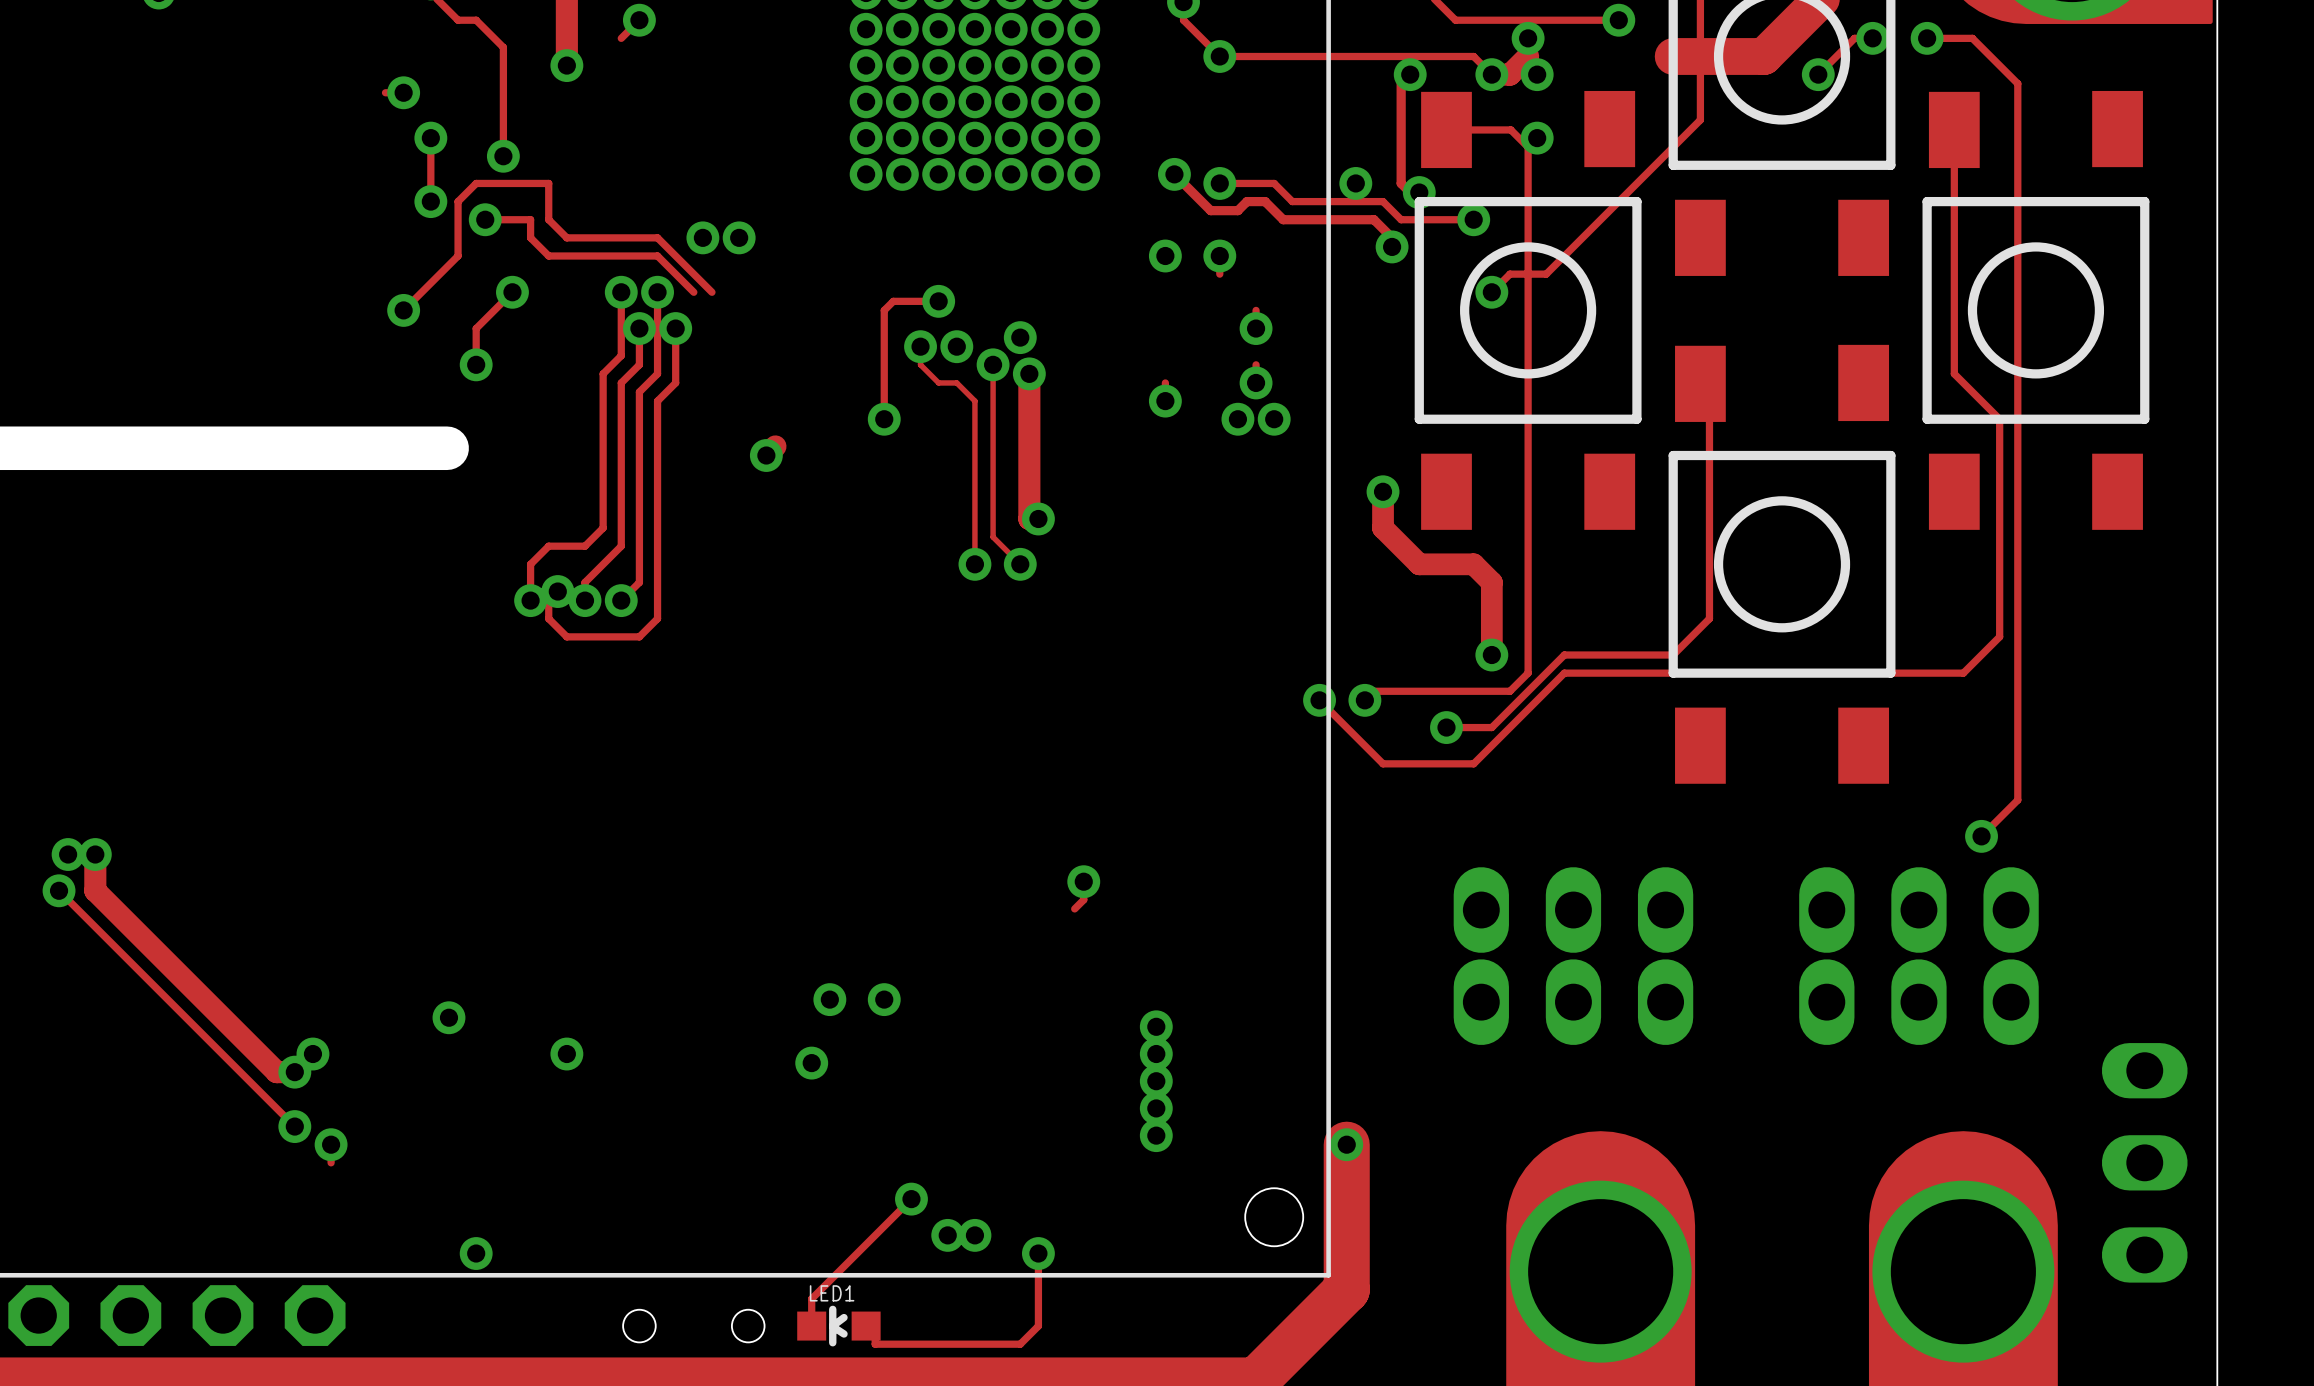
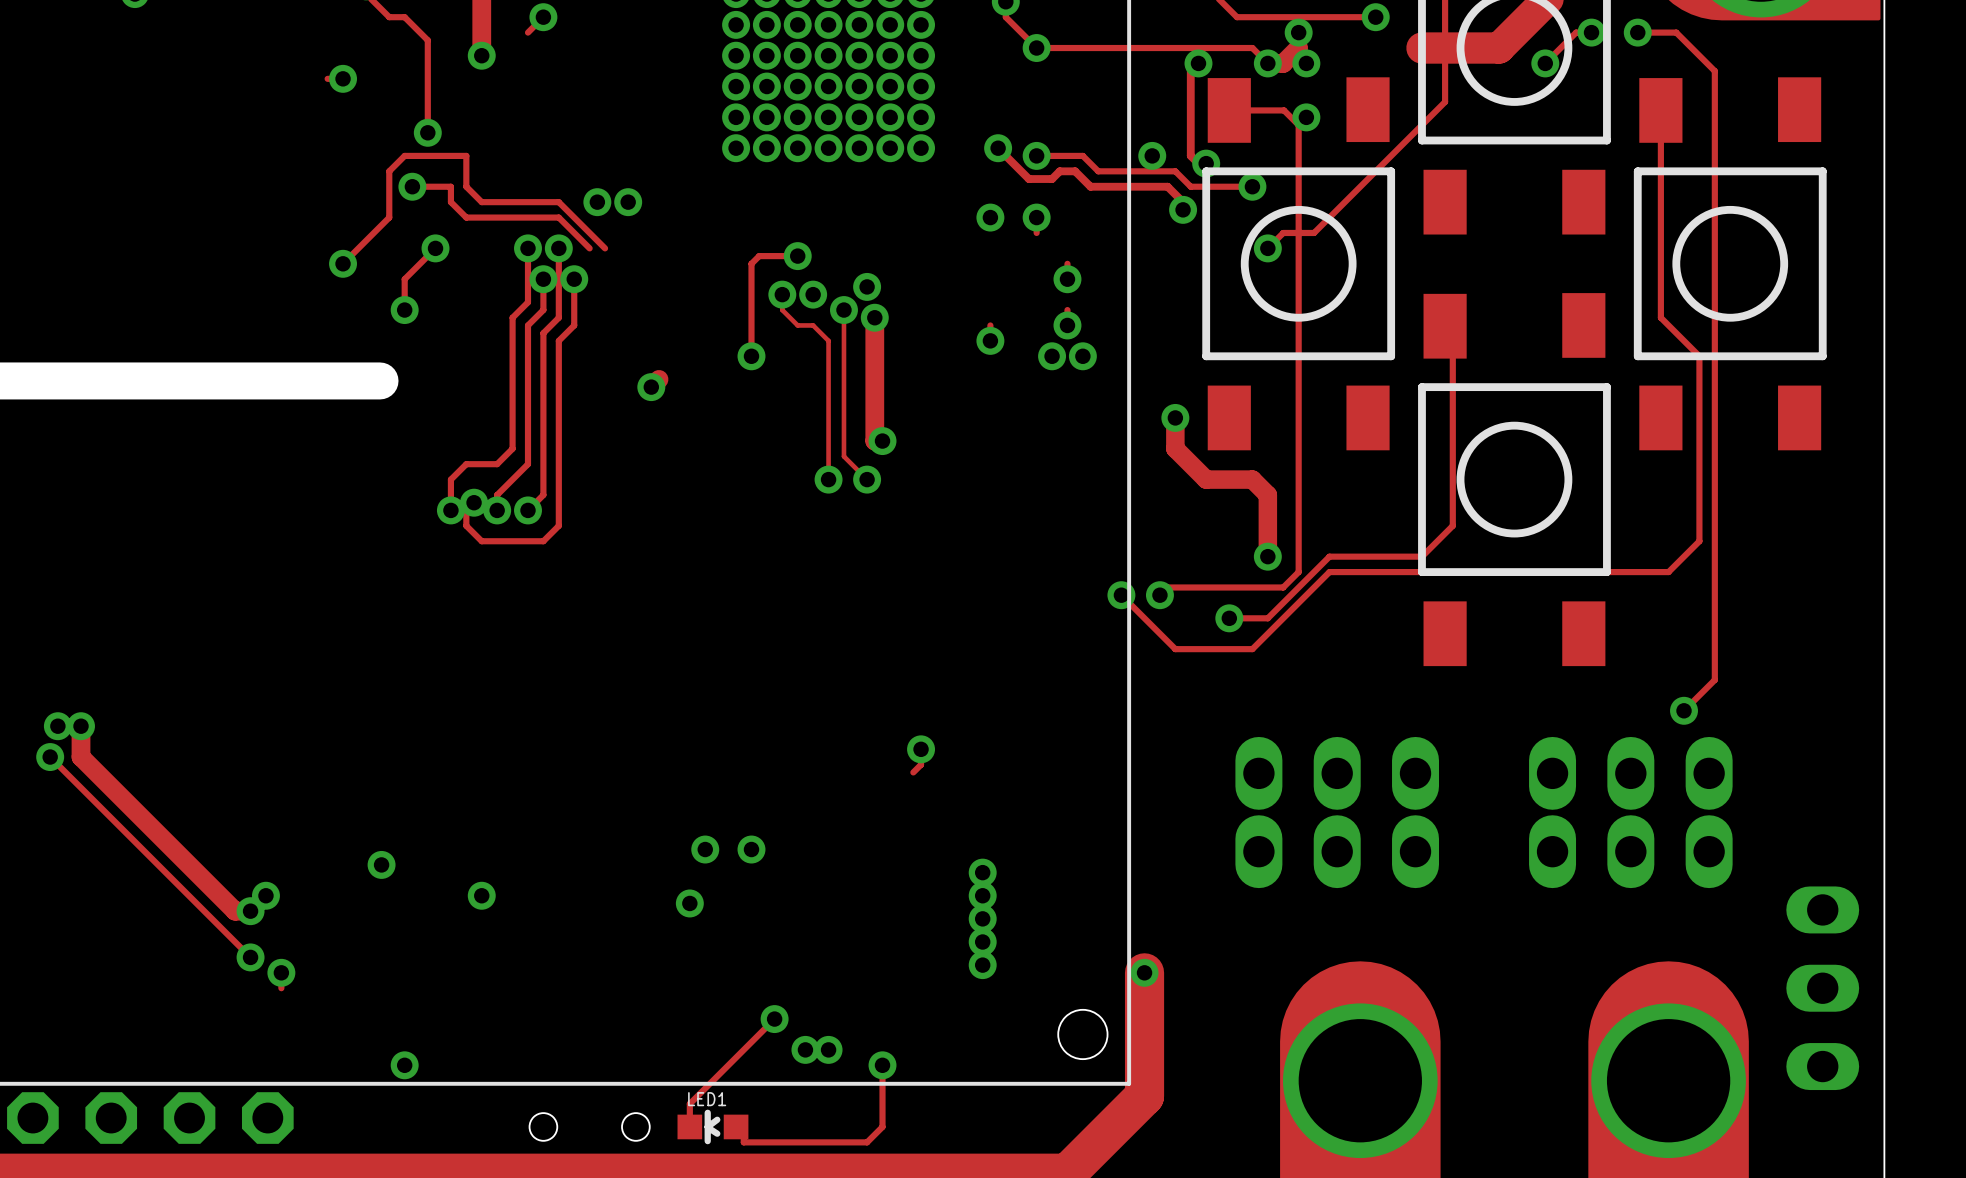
track: (430, 138) (430, 201) -> none
via: (430, 138) -> none
via: (430, 201) -> none

